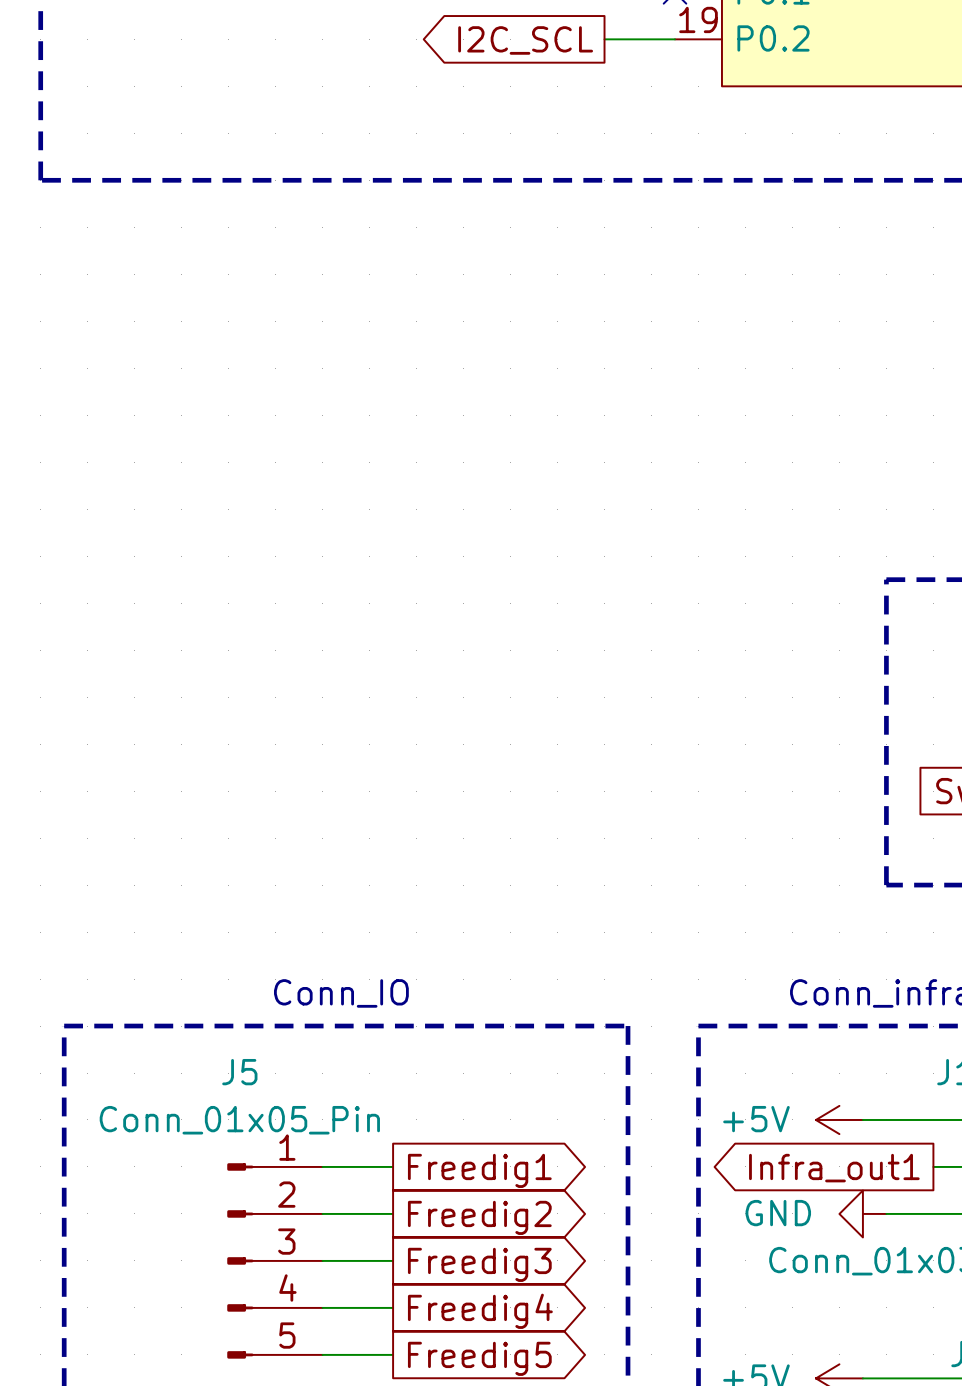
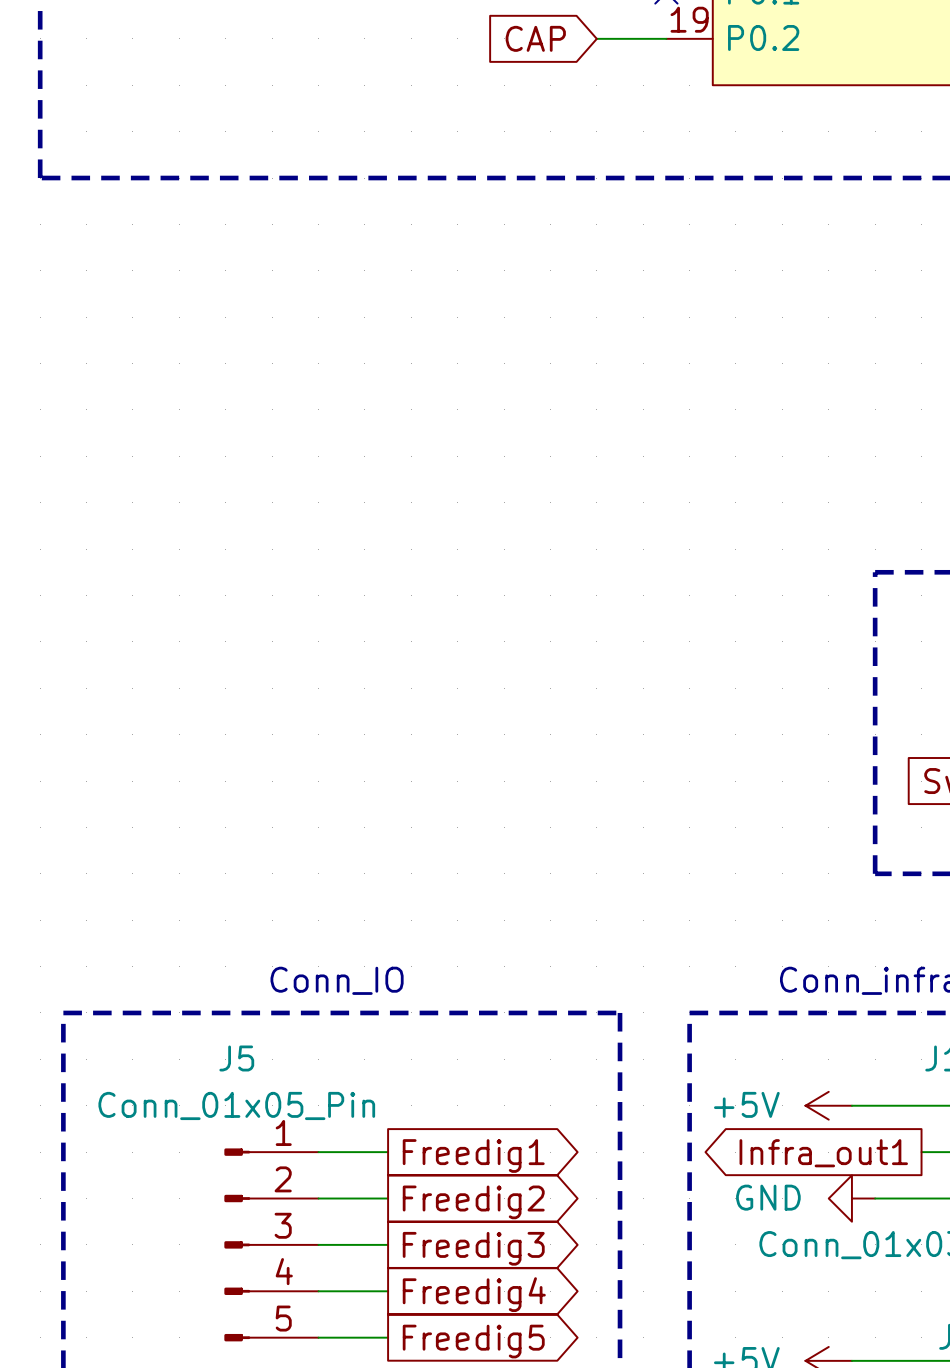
global label shape: output (525, 40) -> input (535, 38)
global label: I2C_SCL (525, 40) -> CAP (535, 38)

